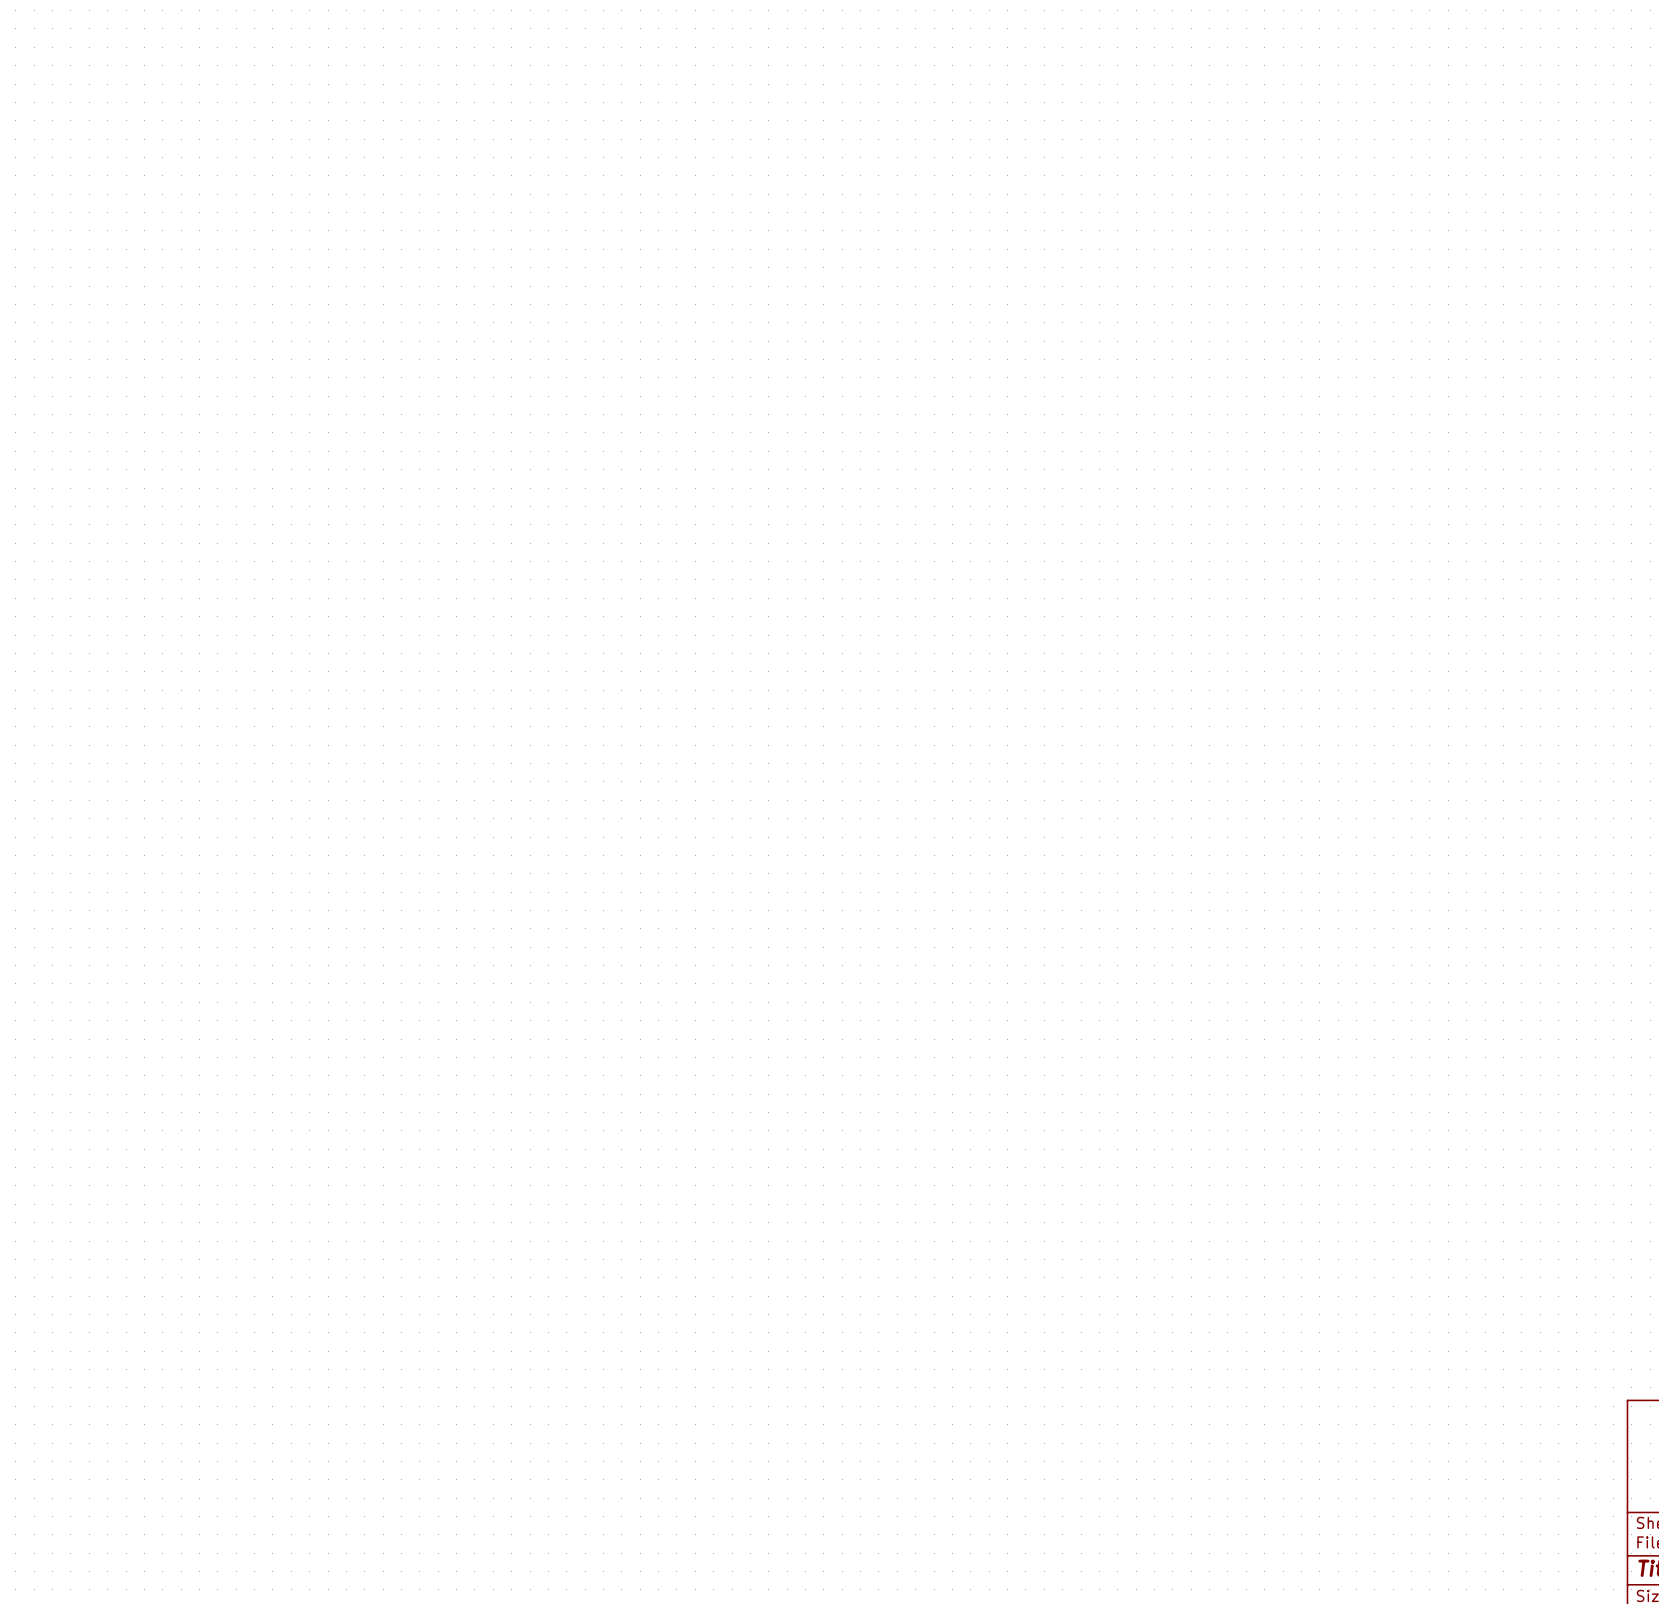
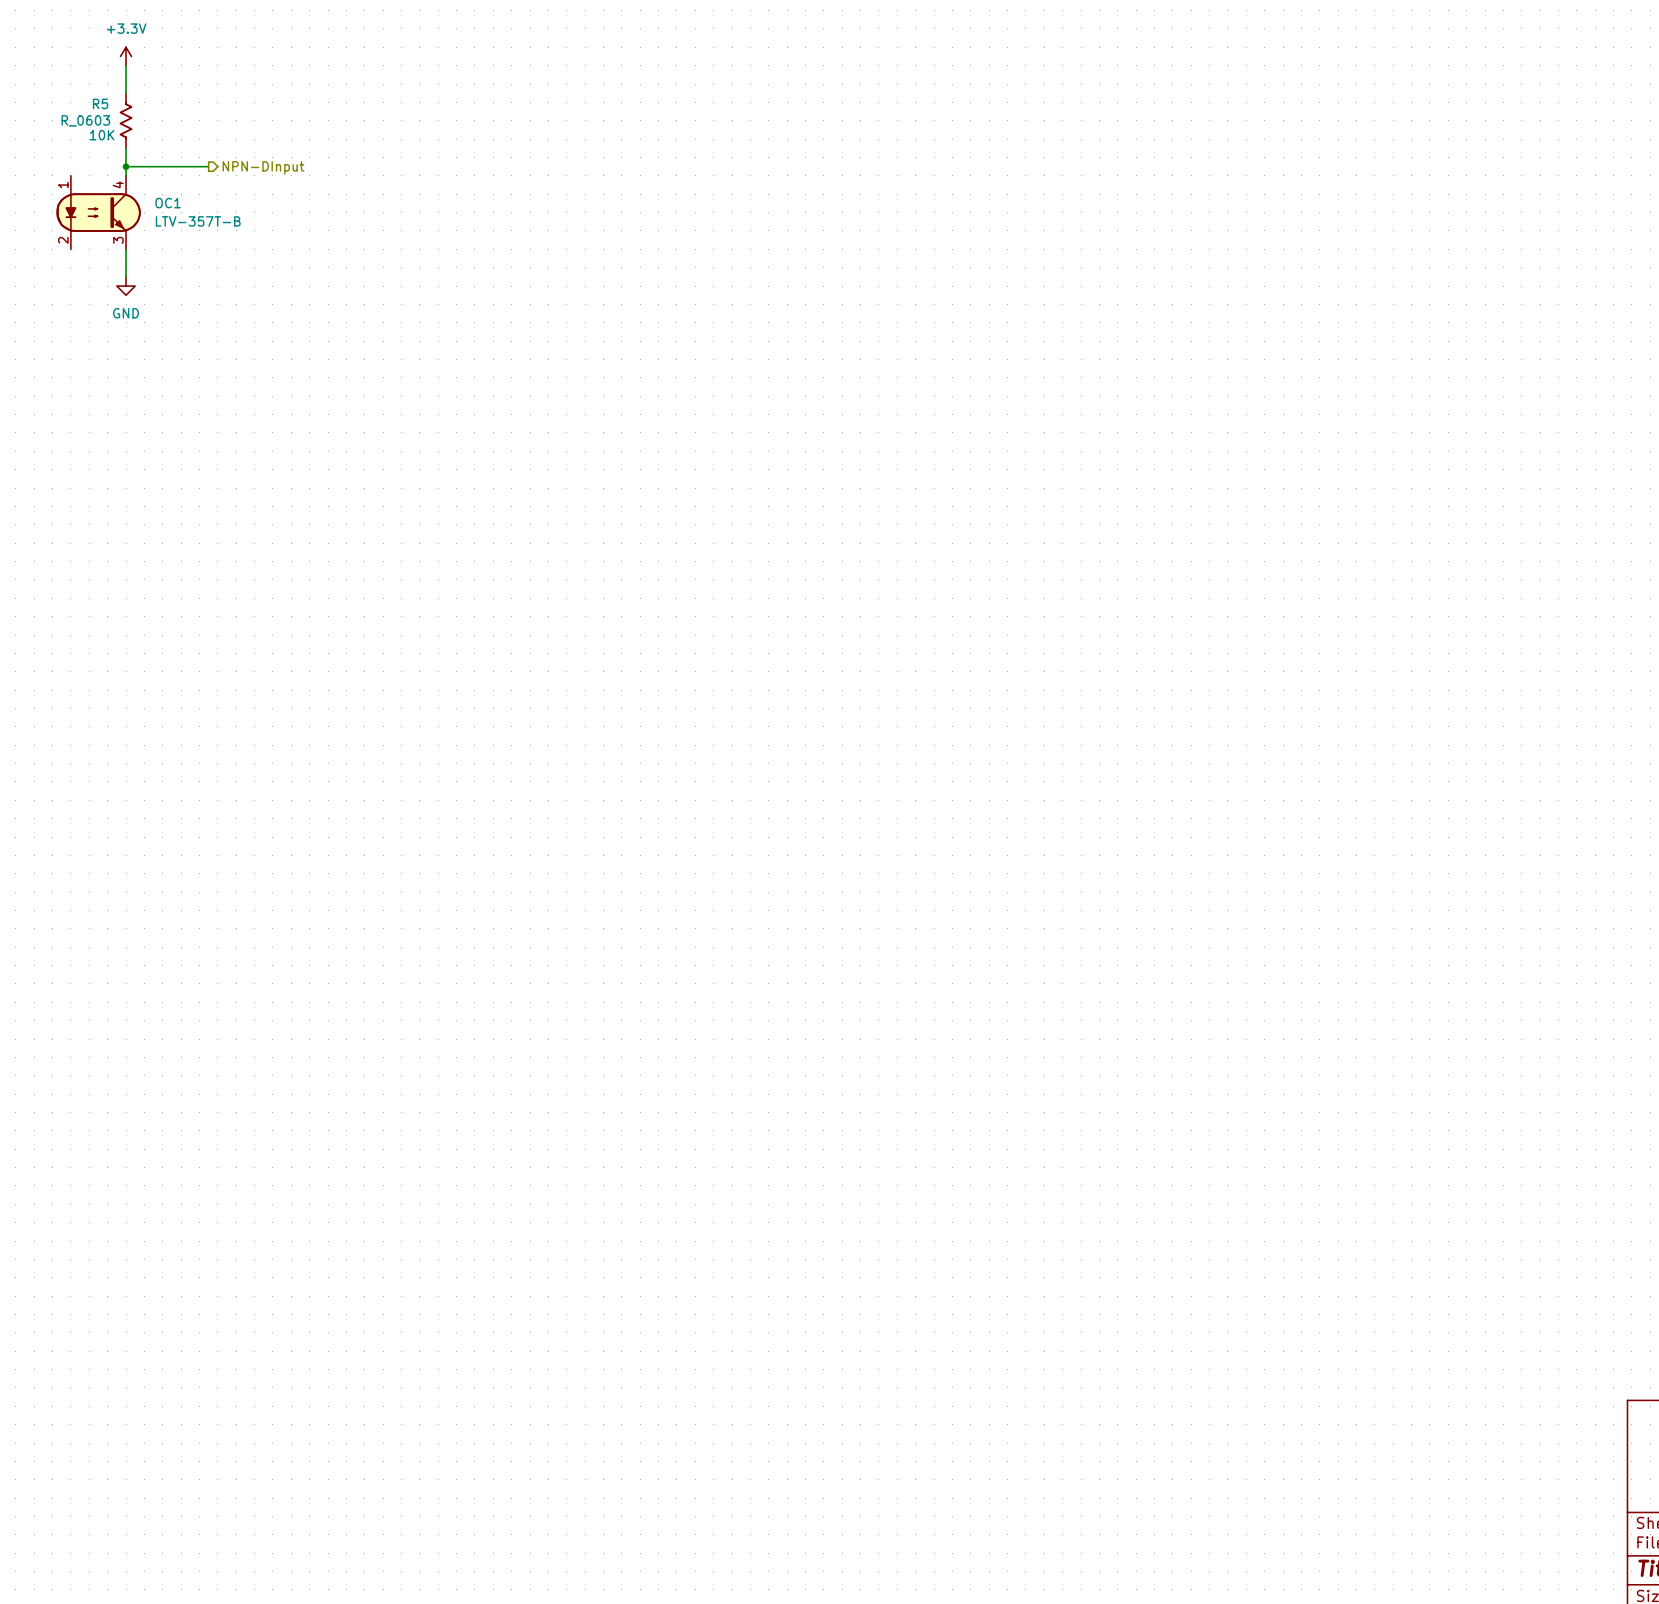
power symbol: none -> +3.3V (126, 56)
wire: none -> (126, 65) (126, 93)
R5: none -> R_0603 (126, 120)
wire: none -> (126, 148) (126, 175)
wire: none -> (126, 166) (208, 166)
junction: none -> (126, 166)
hierarchical label: none -> NPN-DInput (263, 167)
OC1: none -> LTV-357T-B (98, 212)
wire: none -> (126, 249) (126, 276)
power symbol: none -> GND (126, 286)

